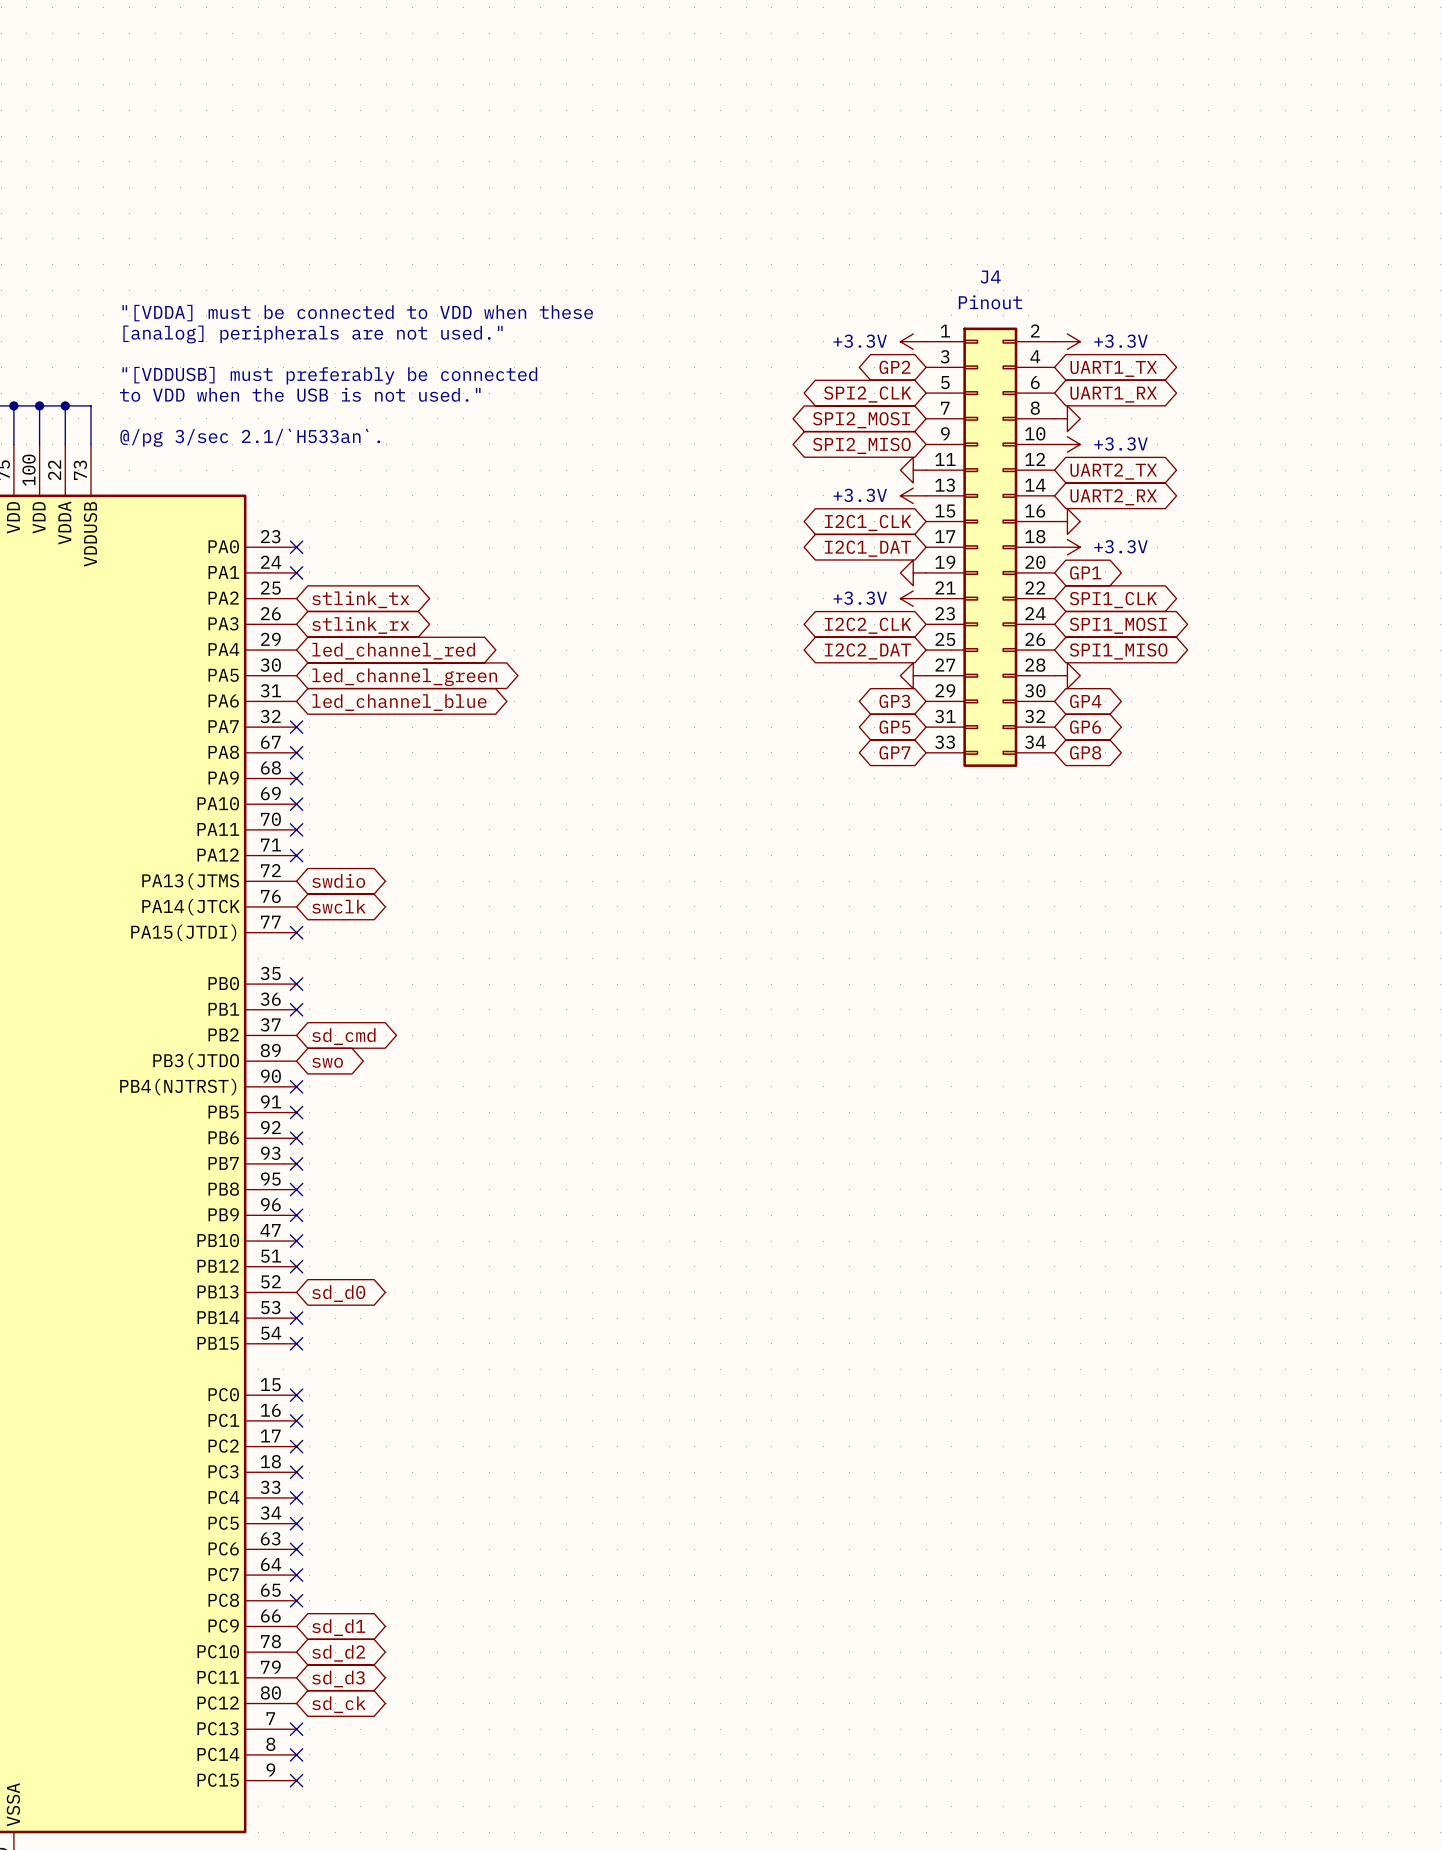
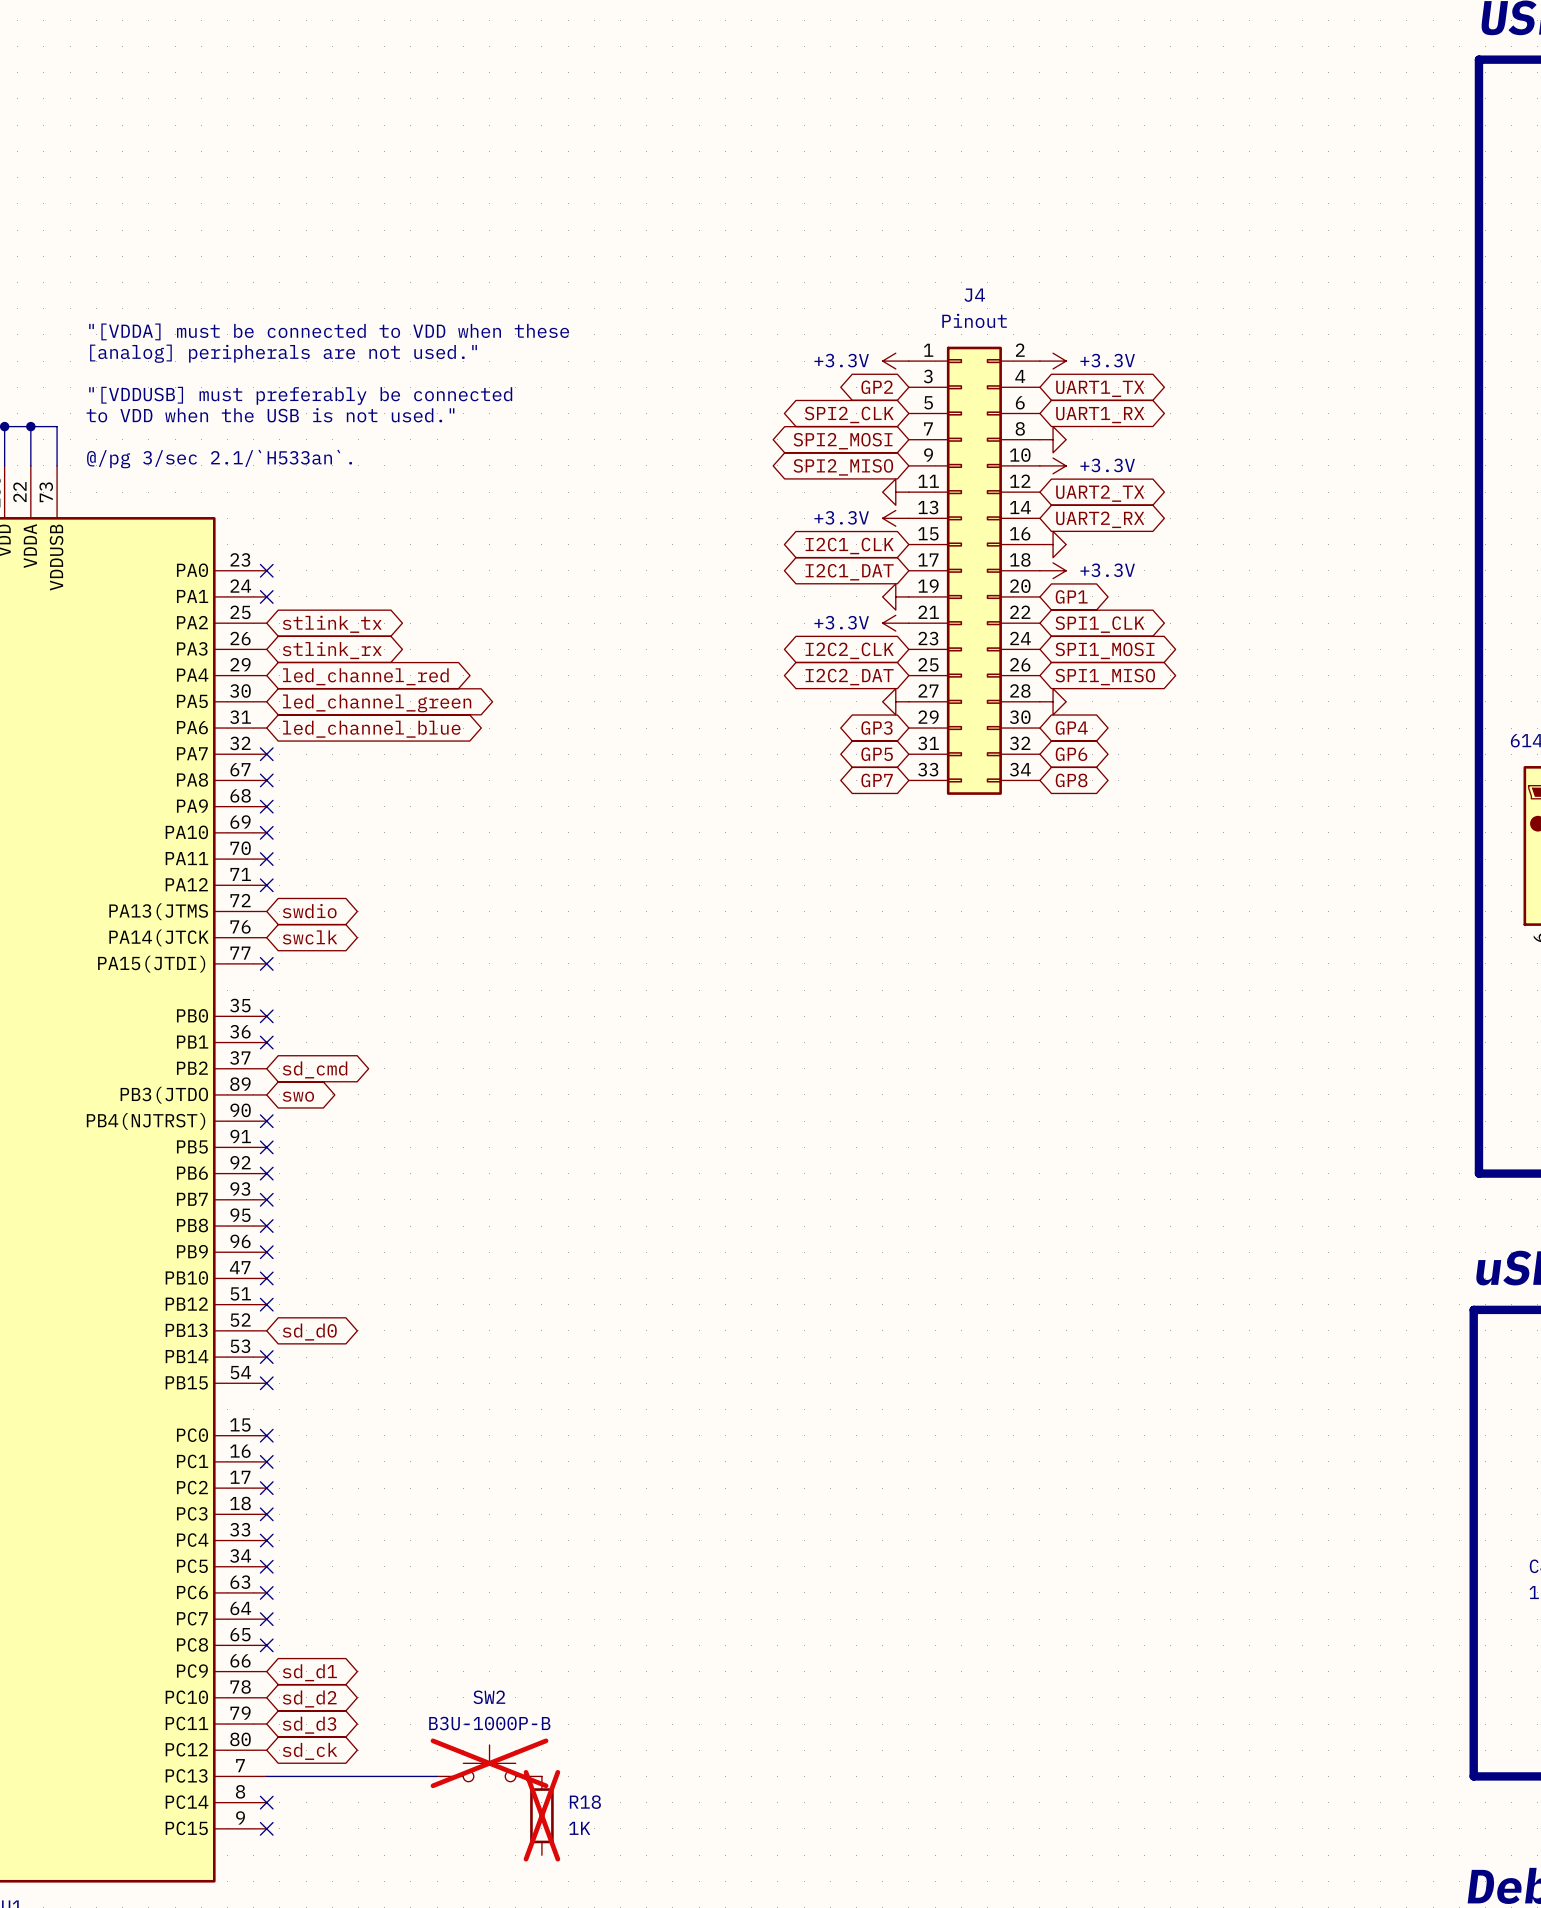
SW2: none -> B3U-1000P-B (489, 1763)
wire: none -> (266, 1776) (437, 1776)
no-connect mark: (296, 1729) -> none
R18: none -> 1K (541, 1815)

